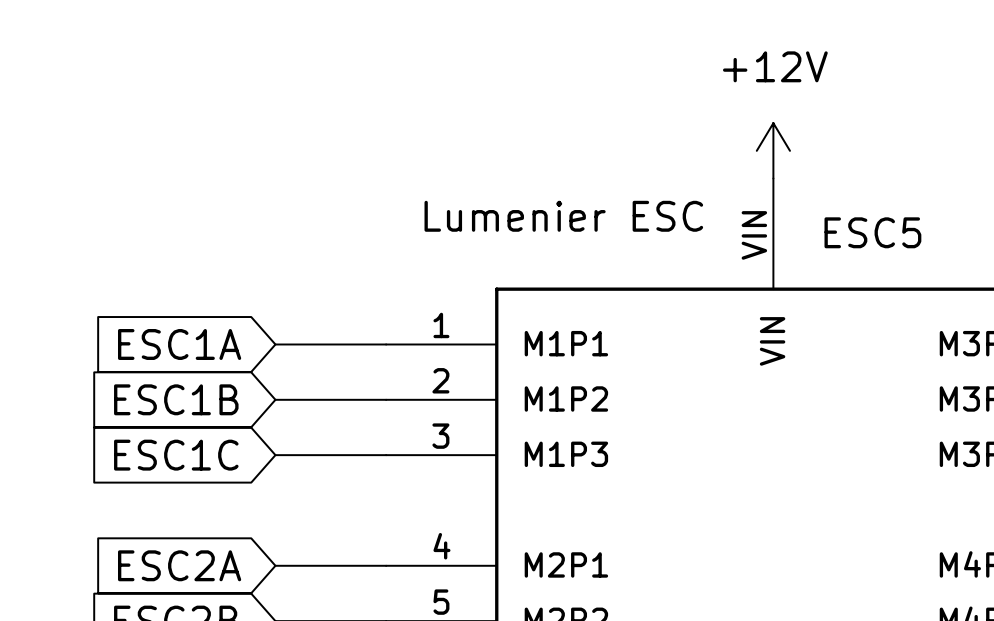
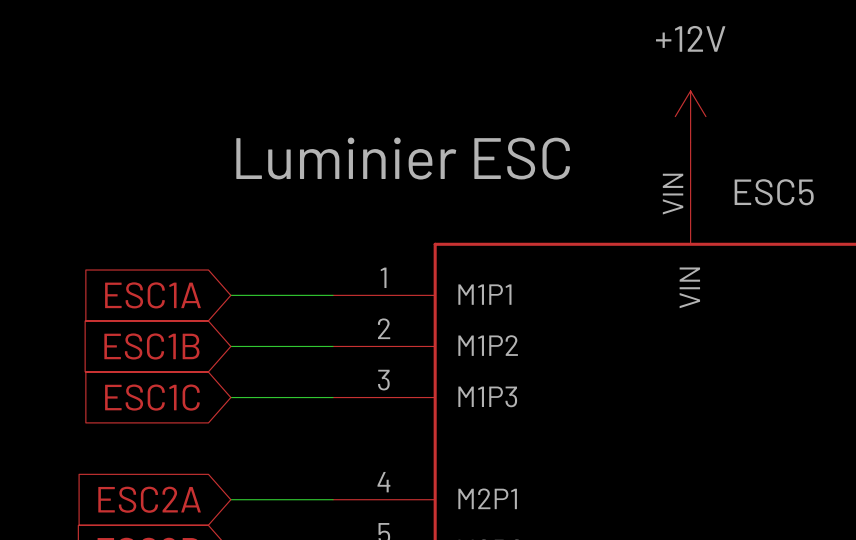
label: none -> Luminier ESC (403, 158)
text: Lumenier ESC (563, 216) -> none

